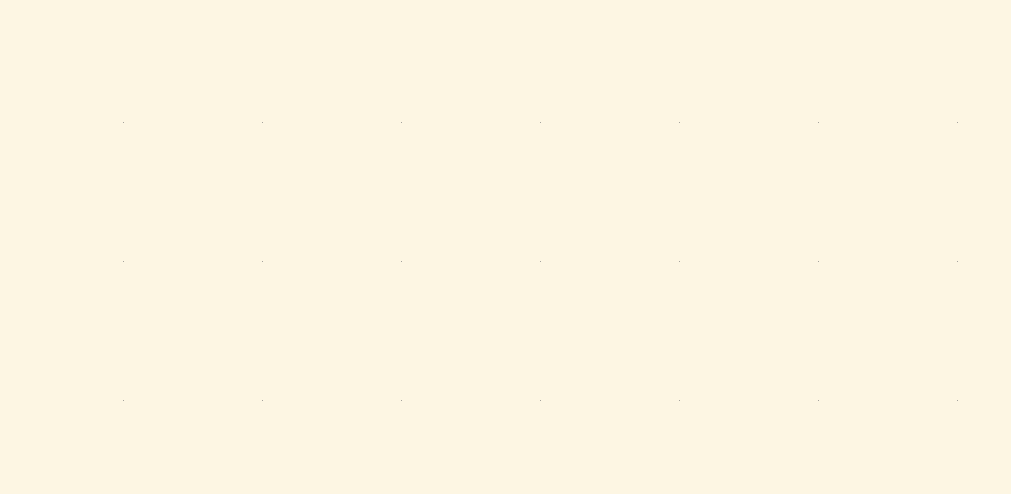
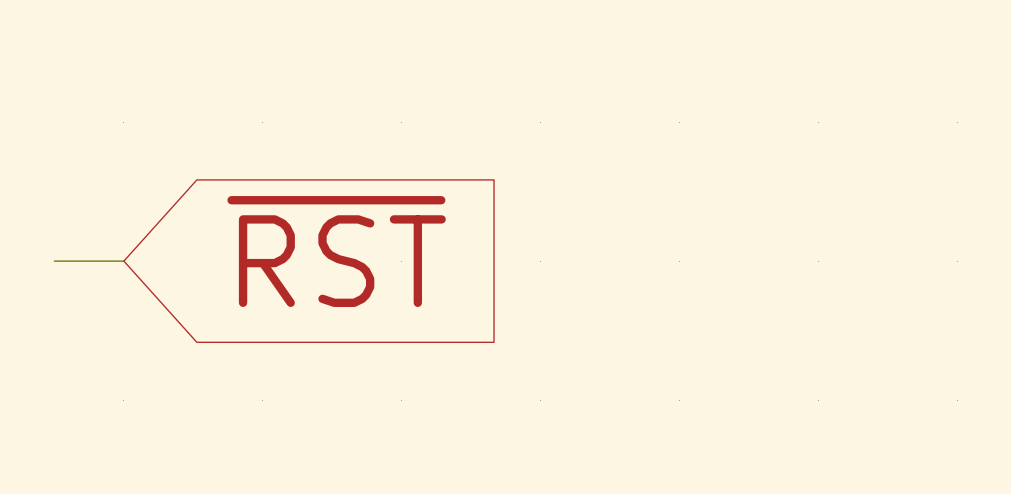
global label: none -> ~{RST} (336, 251)
wire: none -> (54, 261) (123, 261)

